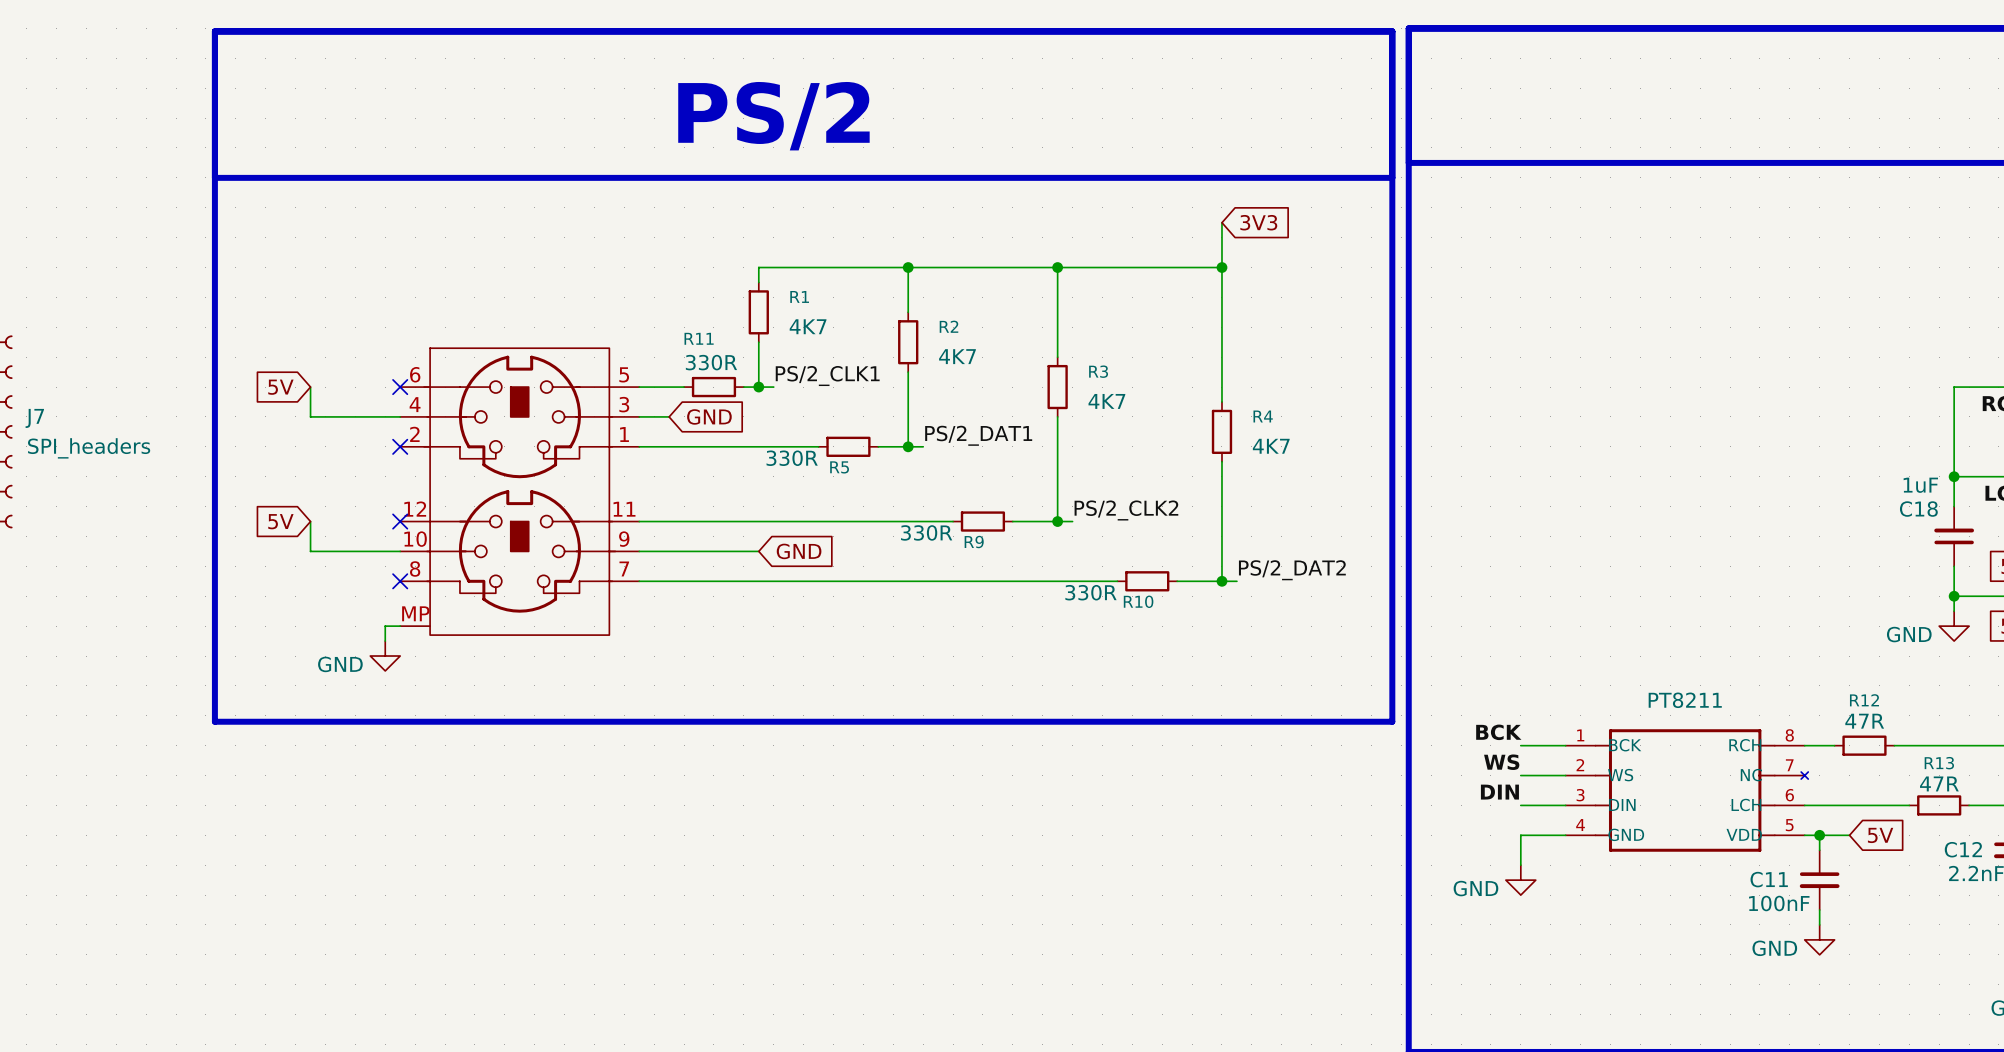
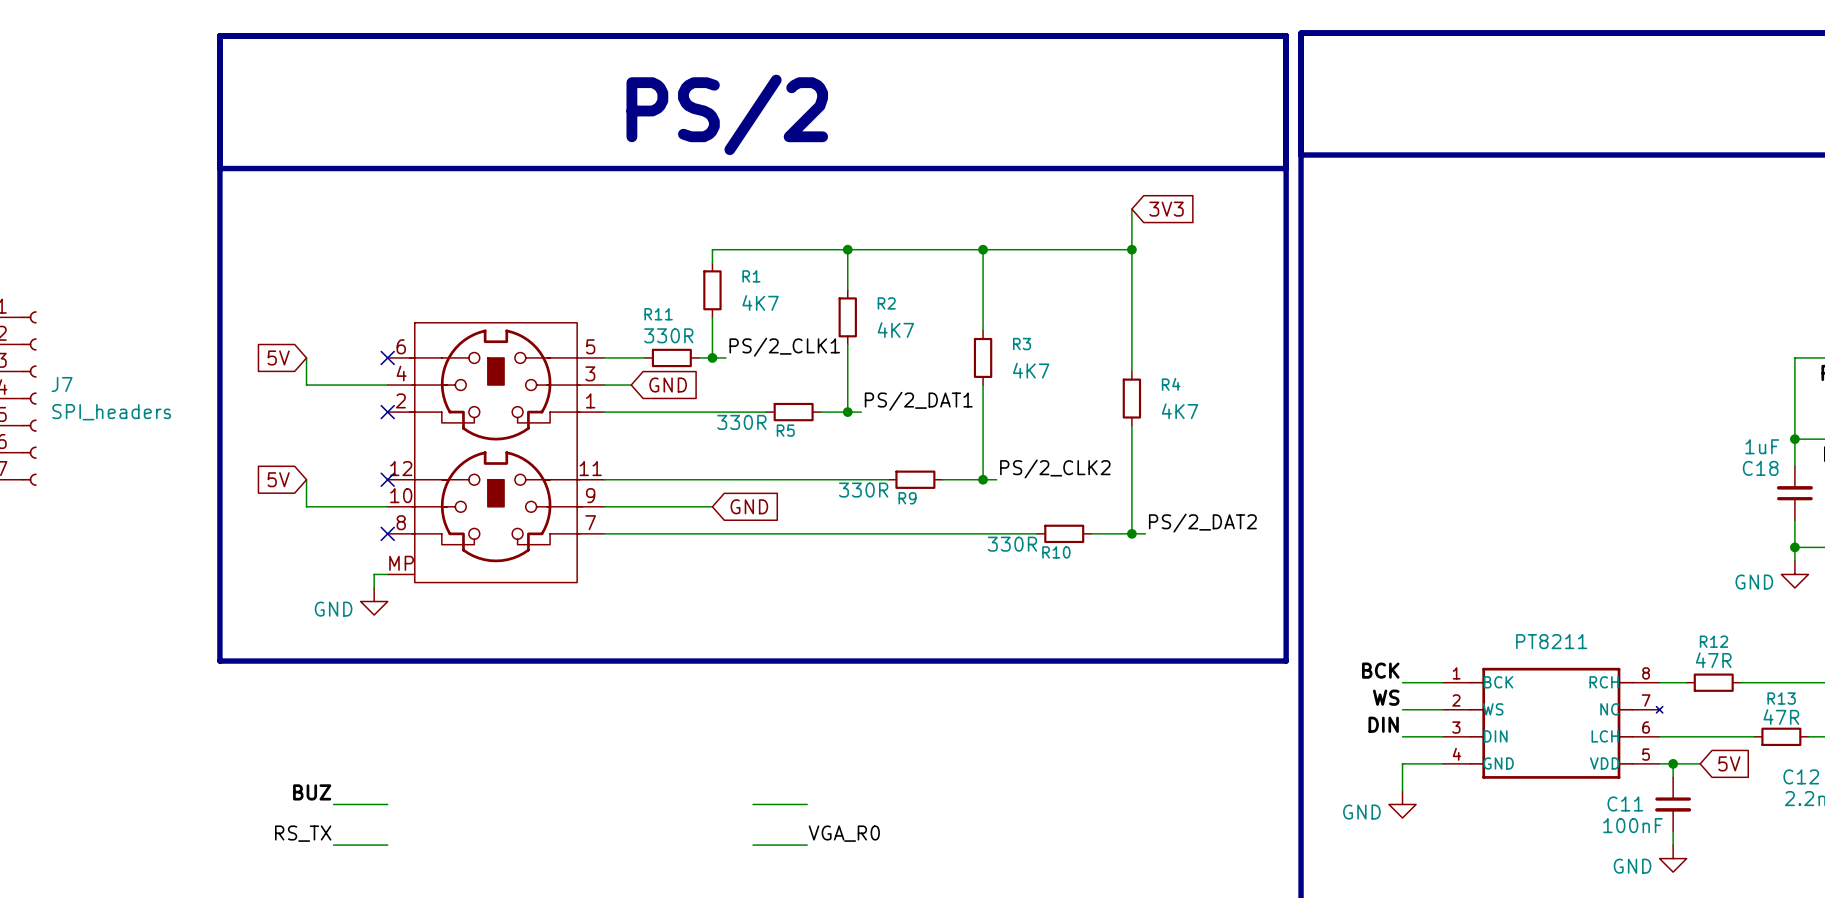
label: none -> BUZ (312, 792)
wire: none -> (333, 804) (387, 804)
wire: none -> (753, 804) (807, 804)
label: none -> RS_TX (303, 833)
label: none -> VGA_R0 (844, 833)
wire: none -> (333, 845) (387, 845)
wire: none -> (753, 845) (807, 845)

